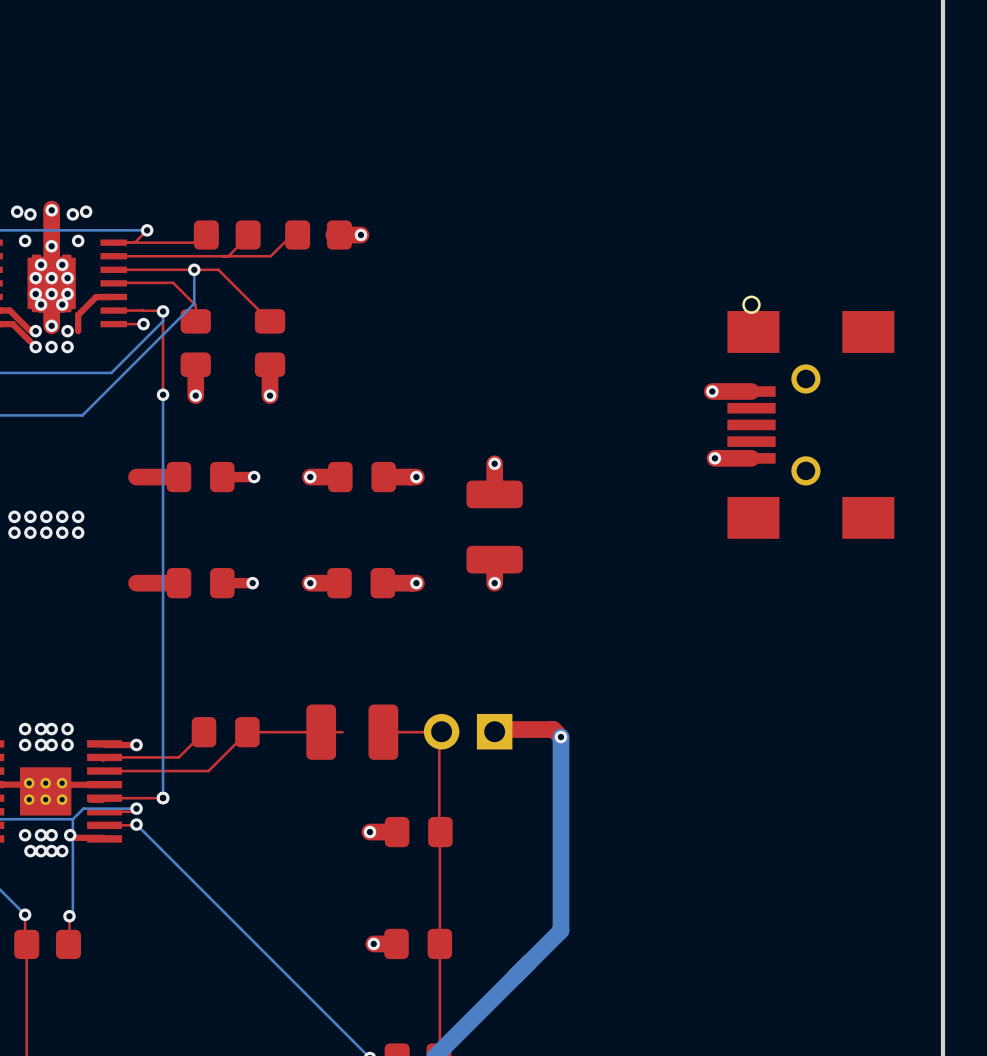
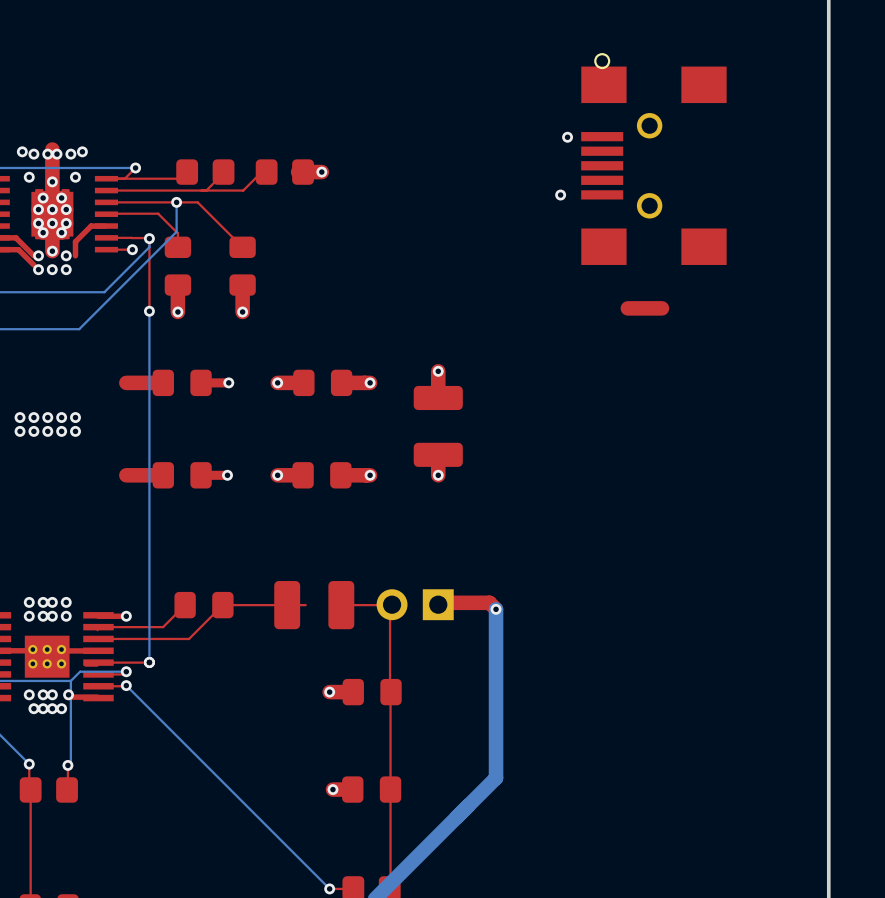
via: none -> (567, 137)
via: (51, 210) -> none
via: none -> (47, 154)
via: none -> (57, 154)
via: none -> (560, 195)
via: (712, 391) -> none
part position: (810, 417) -> (653, 159)
via: (714, 458) -> none
top track: (751, 458) (714, 458) -> none

